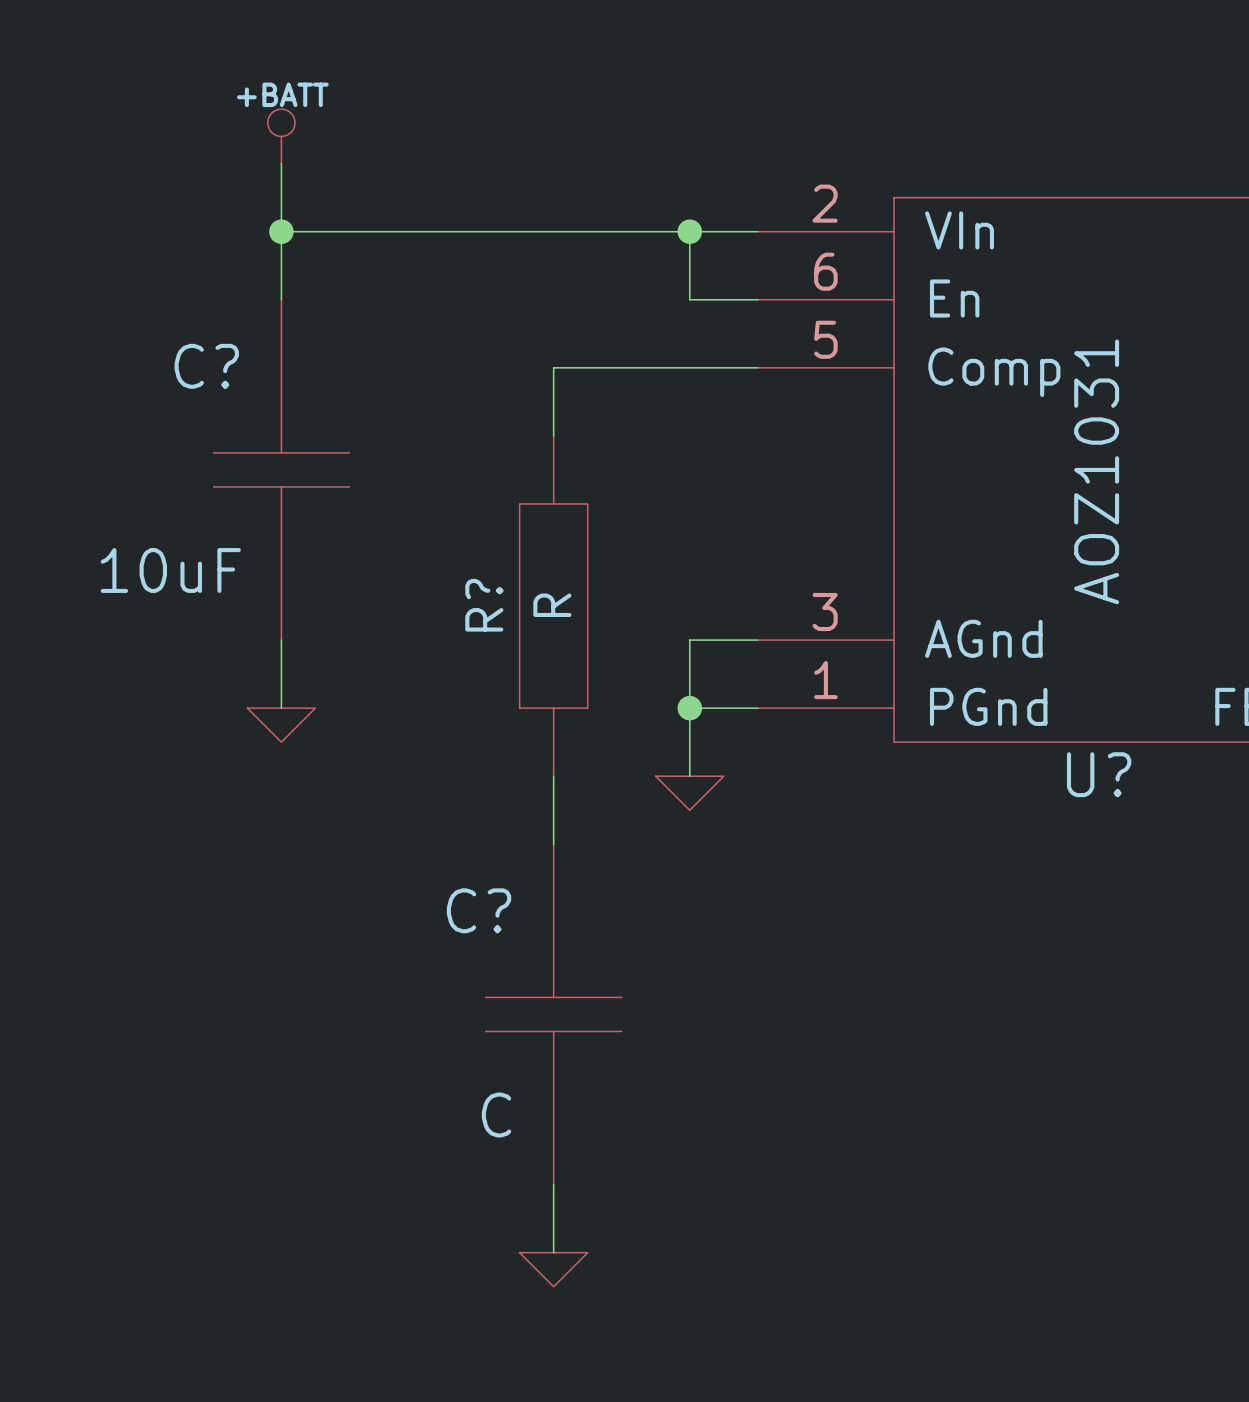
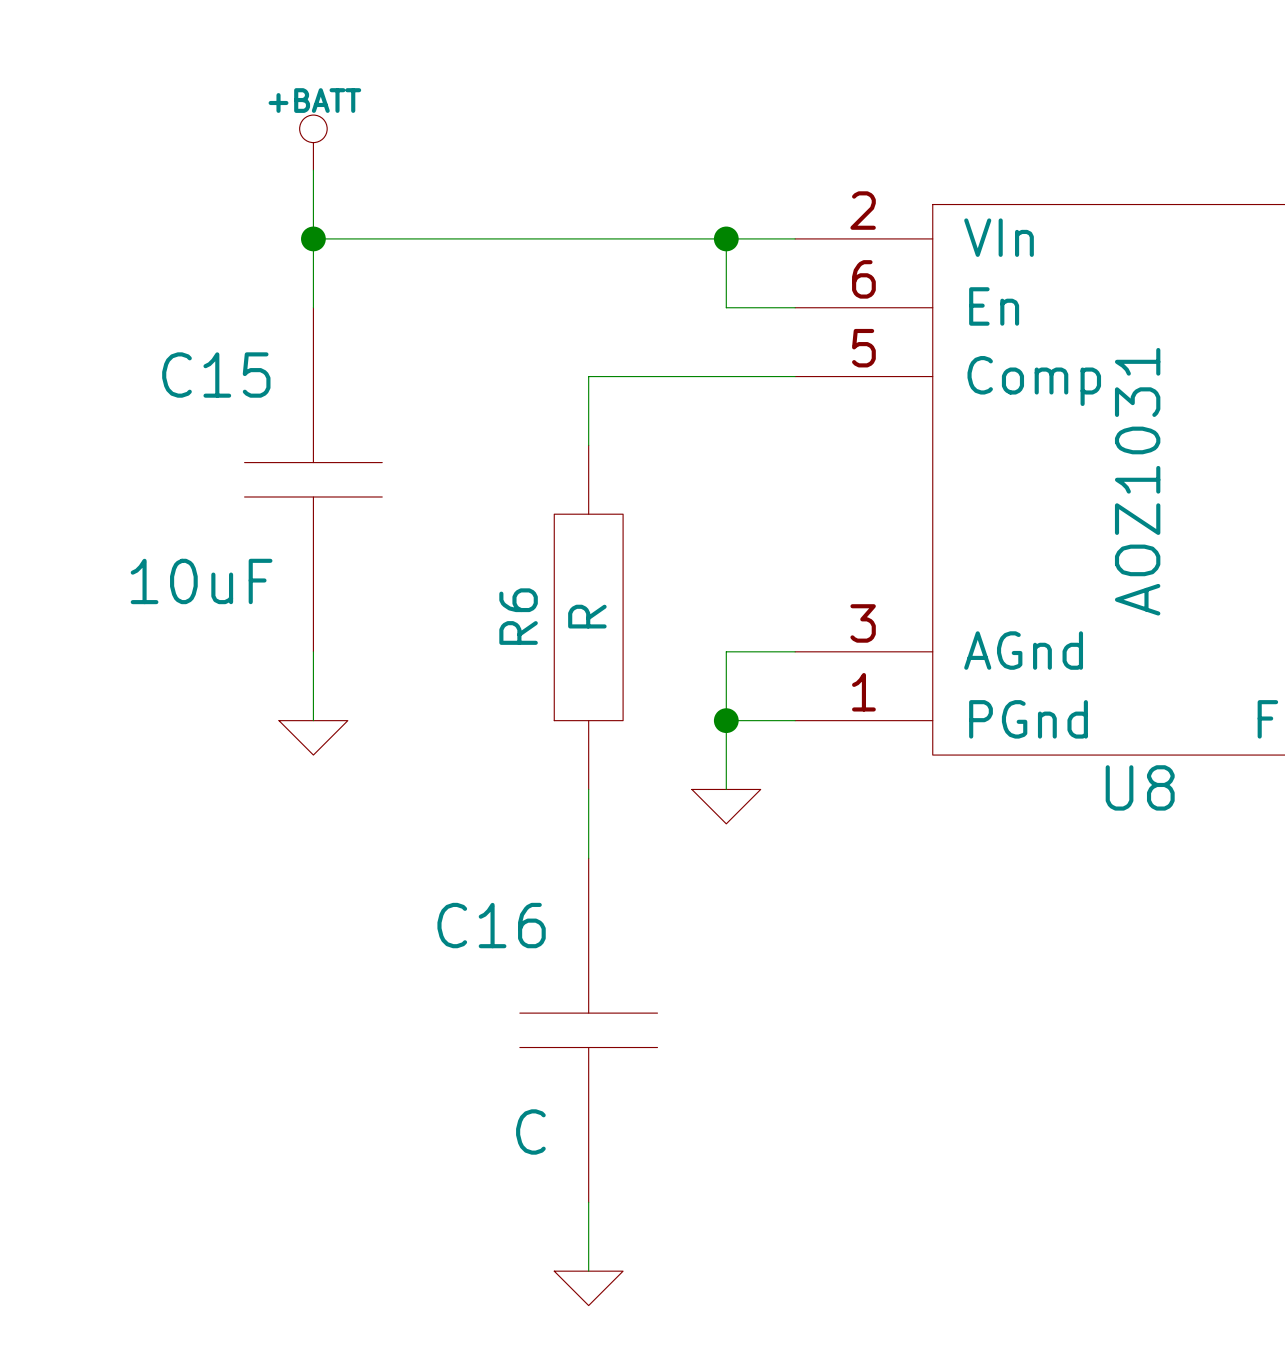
C? name: C? (206, 366) -> C15 (216, 375)
R? name: R? (484, 605) -> R6 (518, 616)
U? name: U? (1099, 774) -> U8 (1140, 787)
C? name: C? (479, 910) -> C16 (491, 925)

